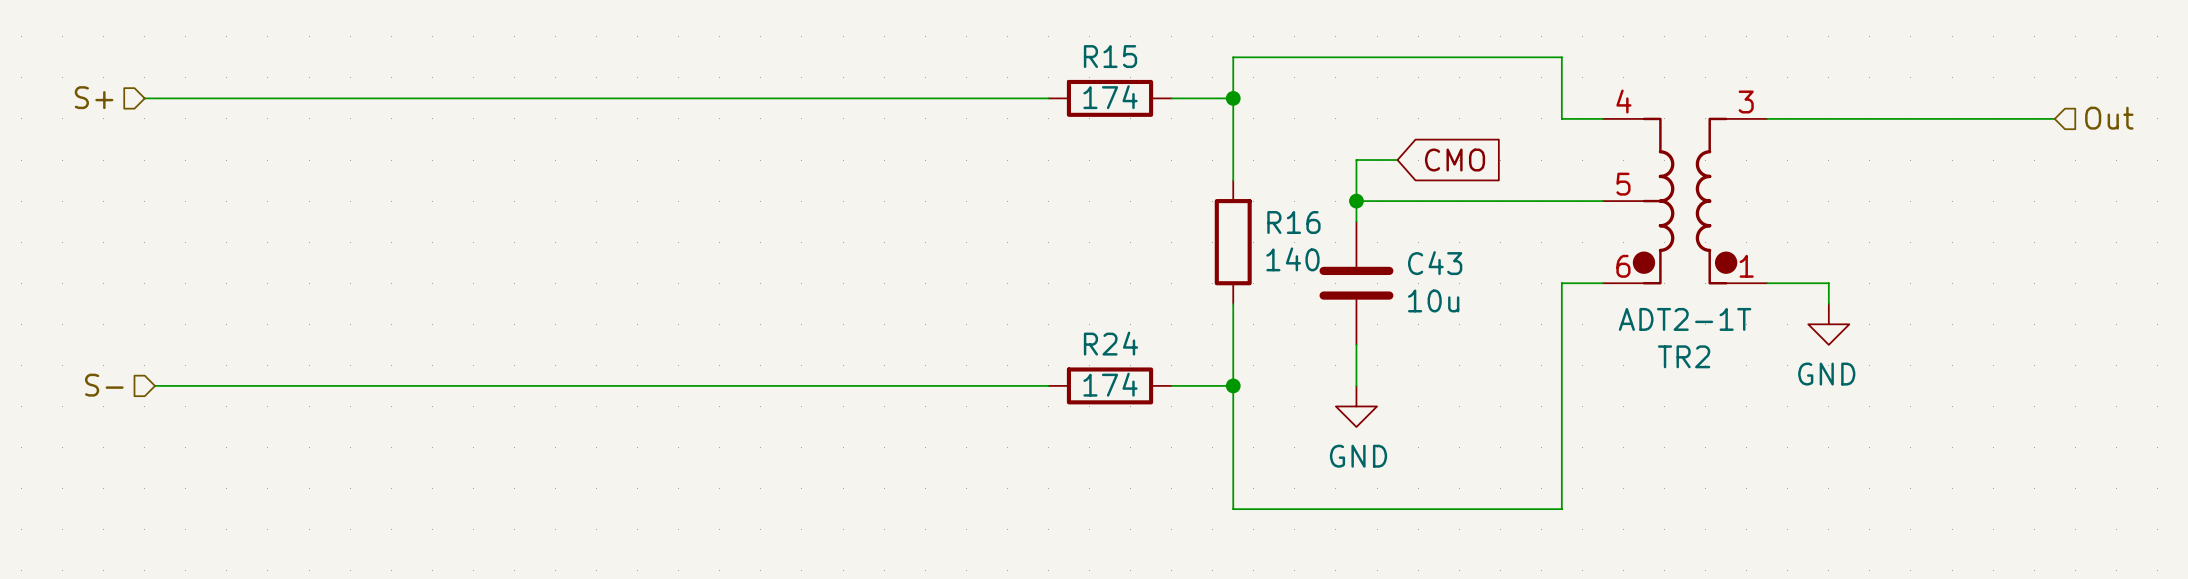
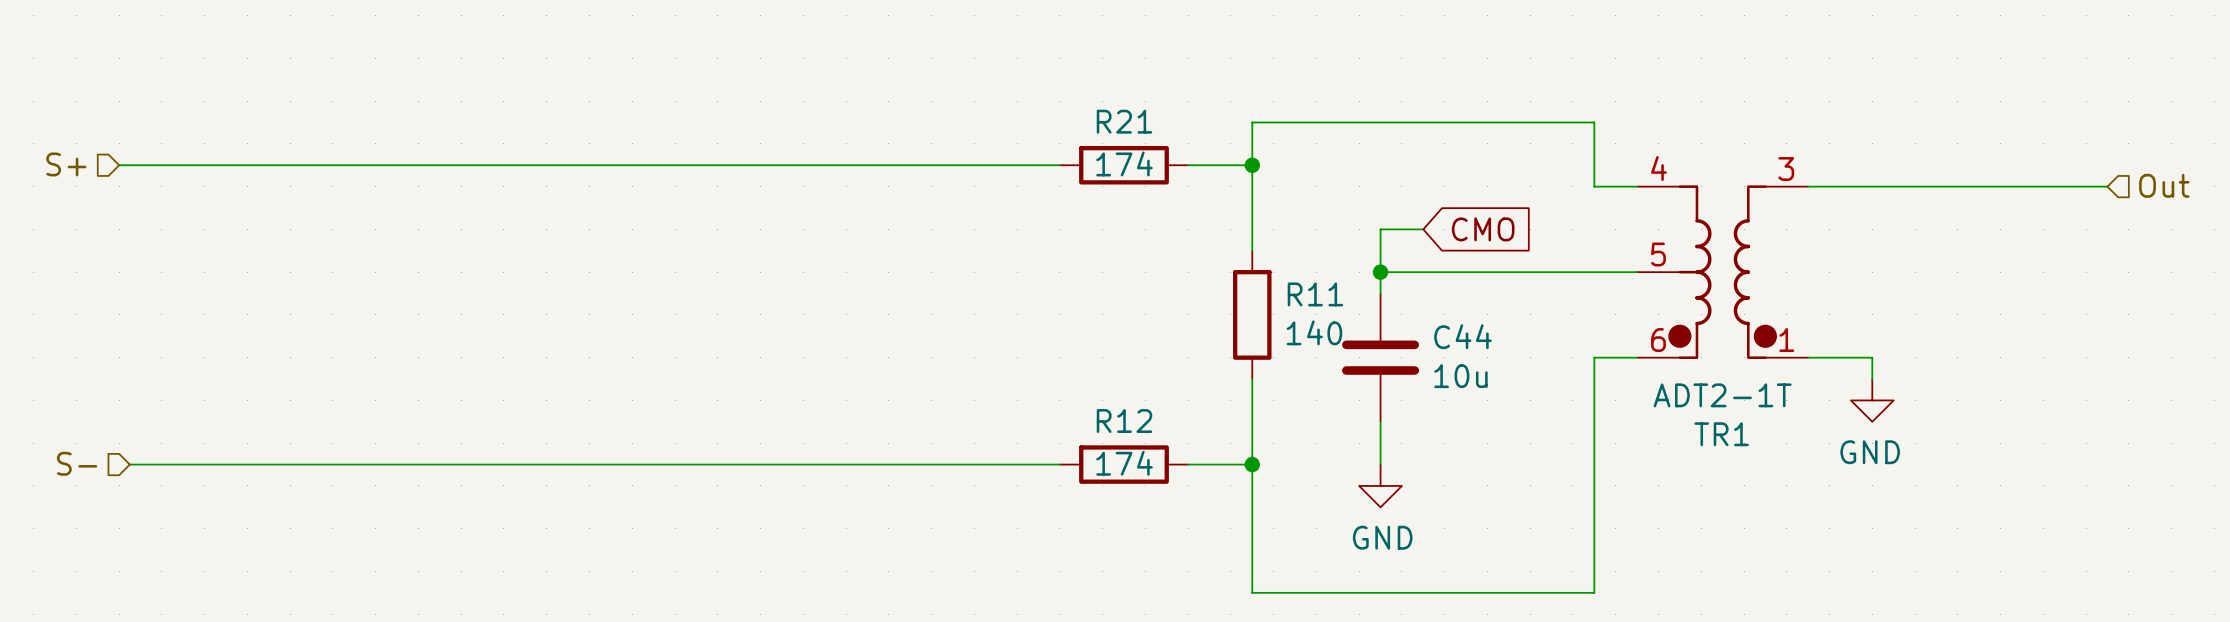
R15 name: R15 (1110, 56) -> R21 (1124, 121)
R16 name: R16 (1293, 222) -> R11 (1315, 294)
C43 name: C43 (1435, 263) -> C44 (1462, 336)
R24 name: R24 (1110, 343) -> R12 (1124, 421)
TR2 name: TR2 (1684, 356) -> TR1 (1721, 434)

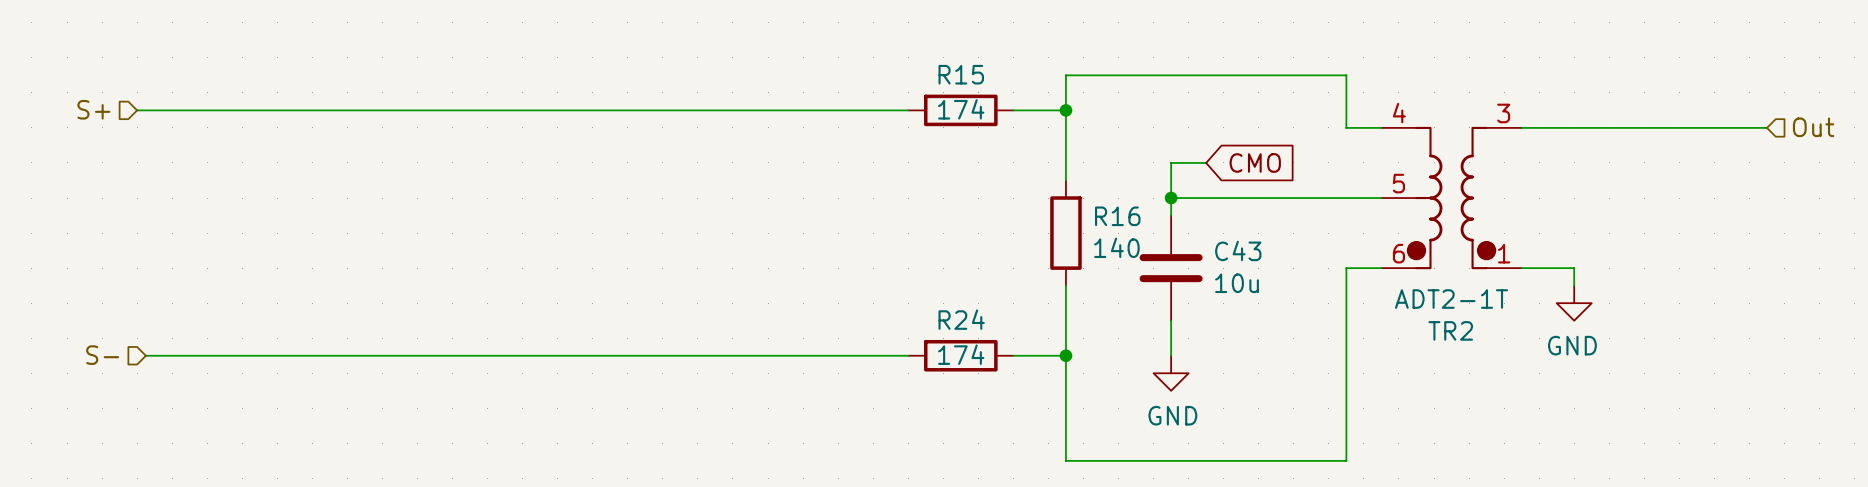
R21 name: R21 (1124, 121) -> R15 (961, 74)
R11 name: R11 (1315, 294) -> R16 (1117, 216)
C44 name: C44 (1462, 336) -> C43 (1238, 250)
R12 name: R12 (1124, 421) -> R24 (961, 319)
TR1 name: TR1 (1721, 434) -> TR2 (1450, 330)

